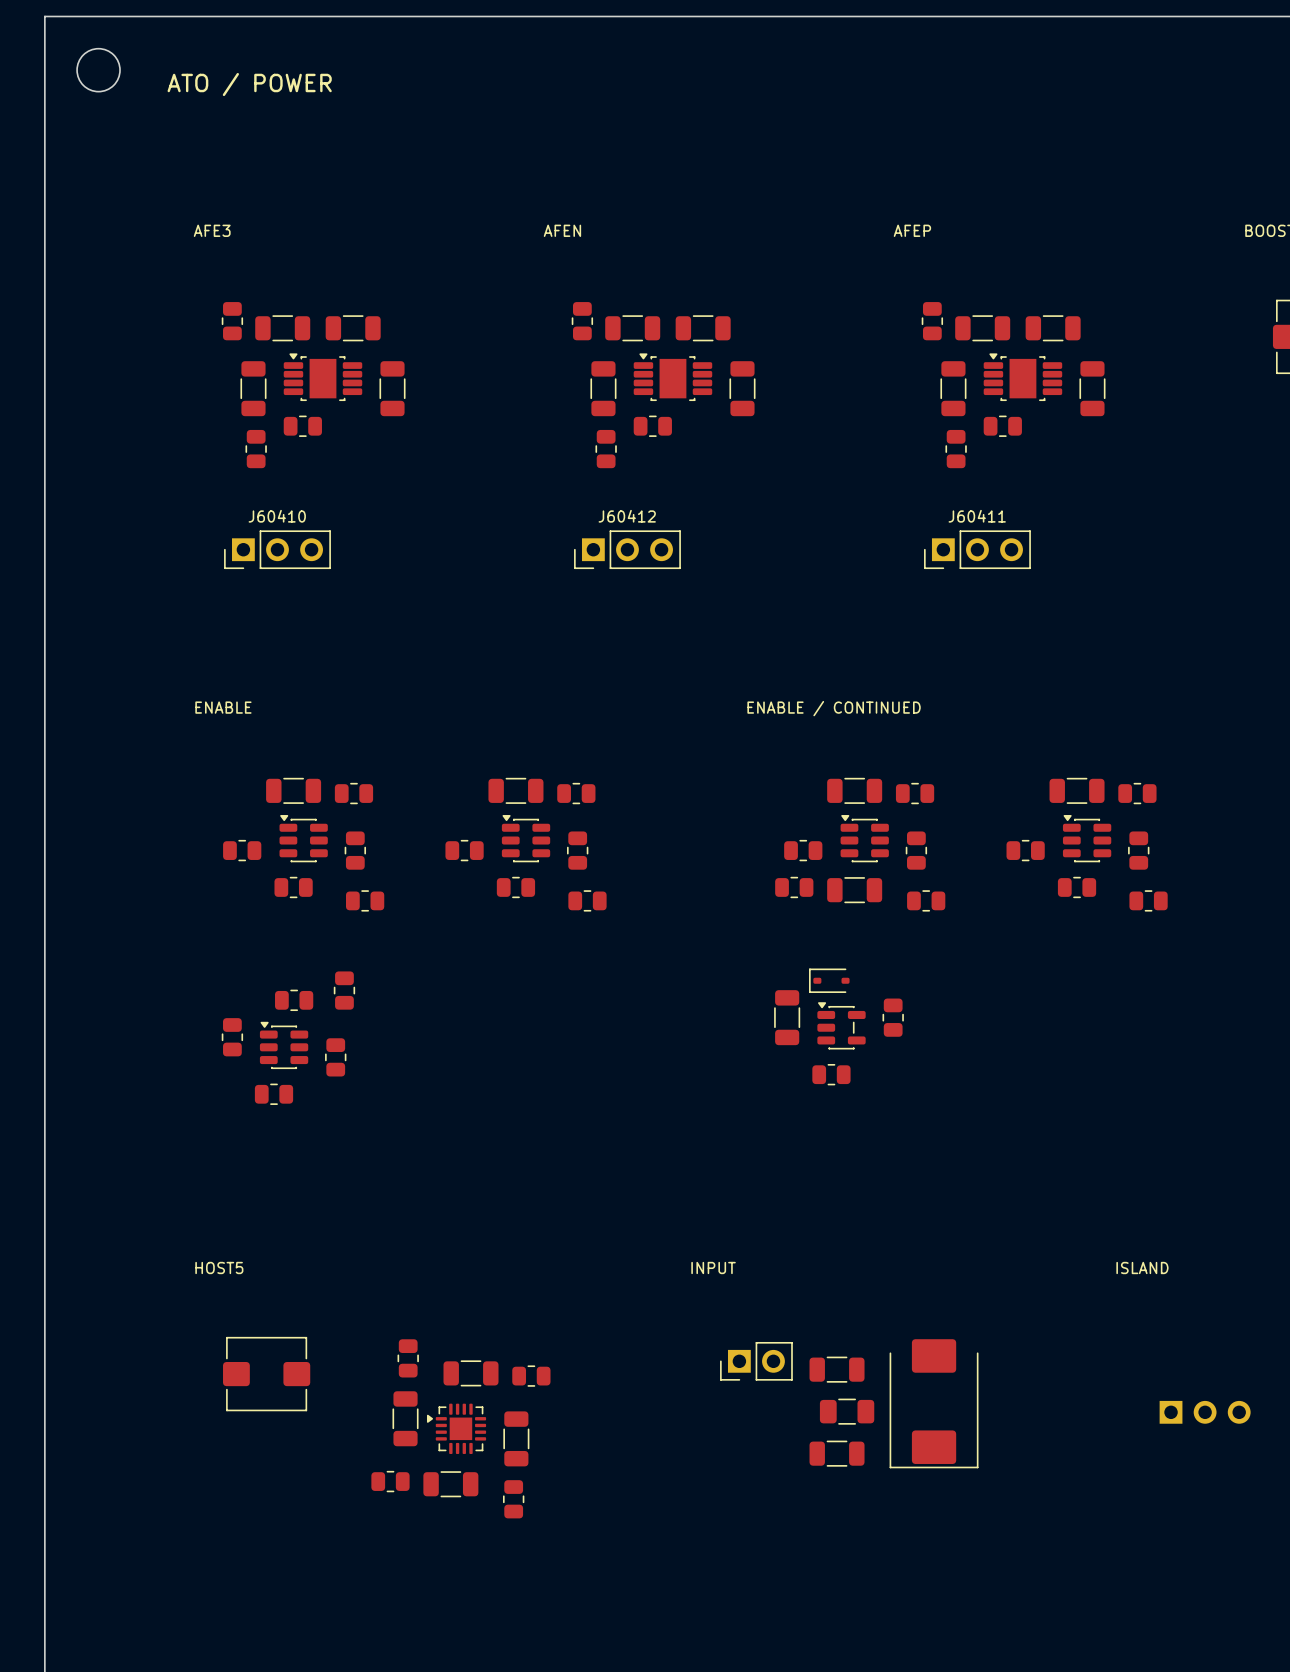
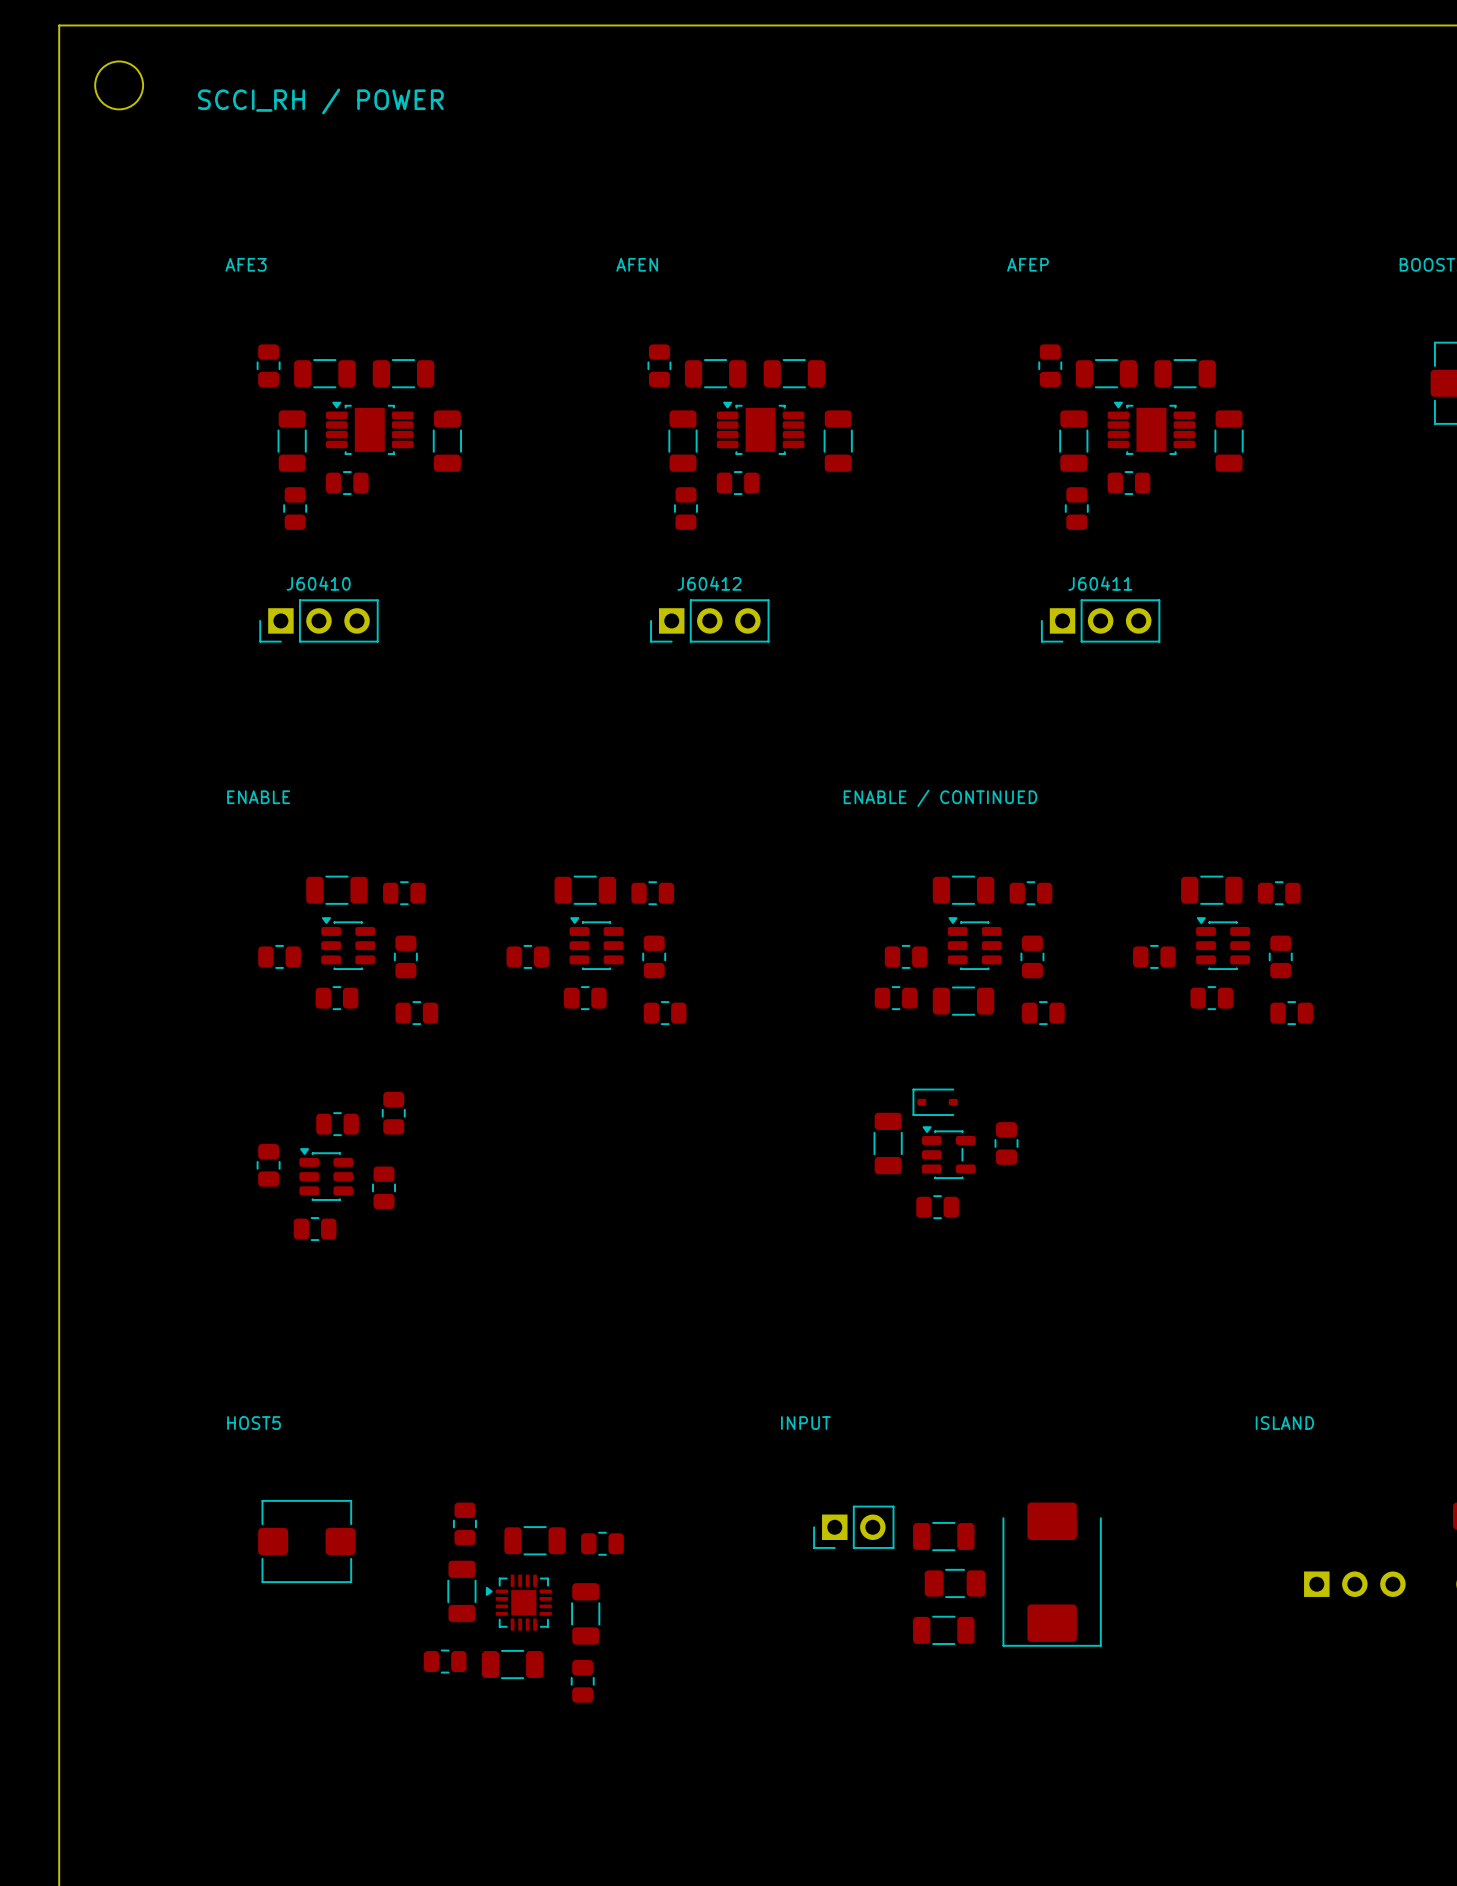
text: ATO / POWER (249, 84) -> SCCI_RH / POWER (320, 101)

